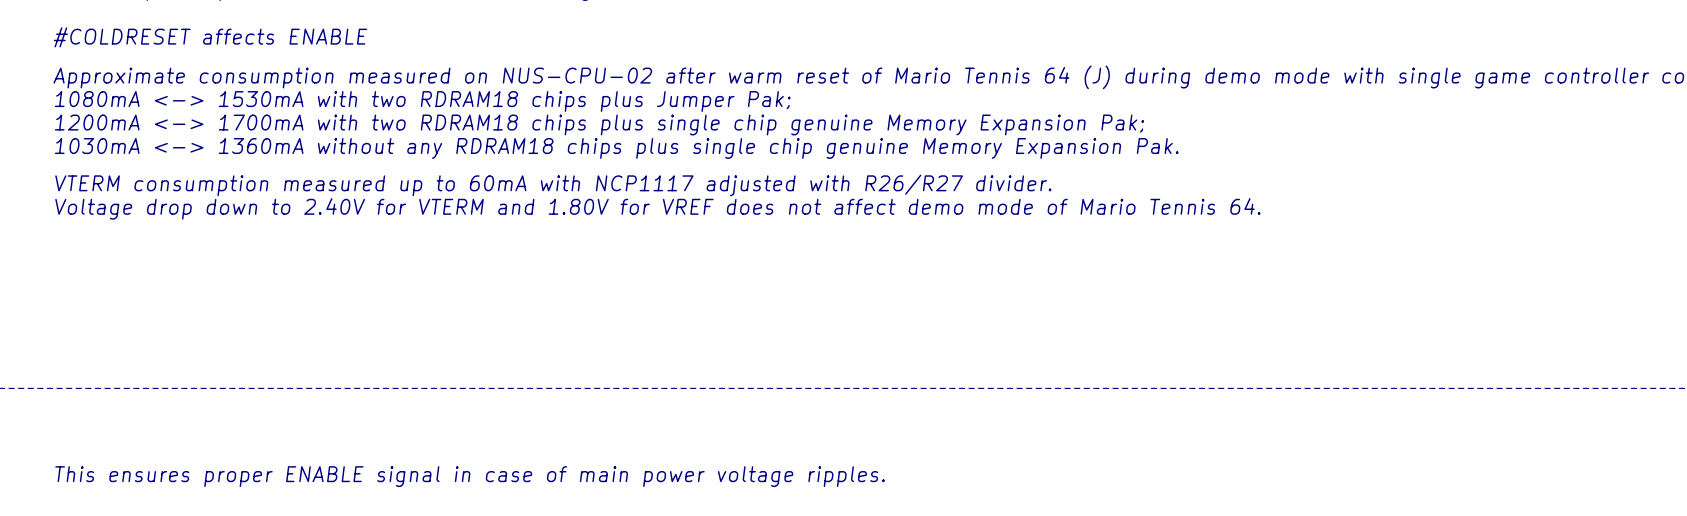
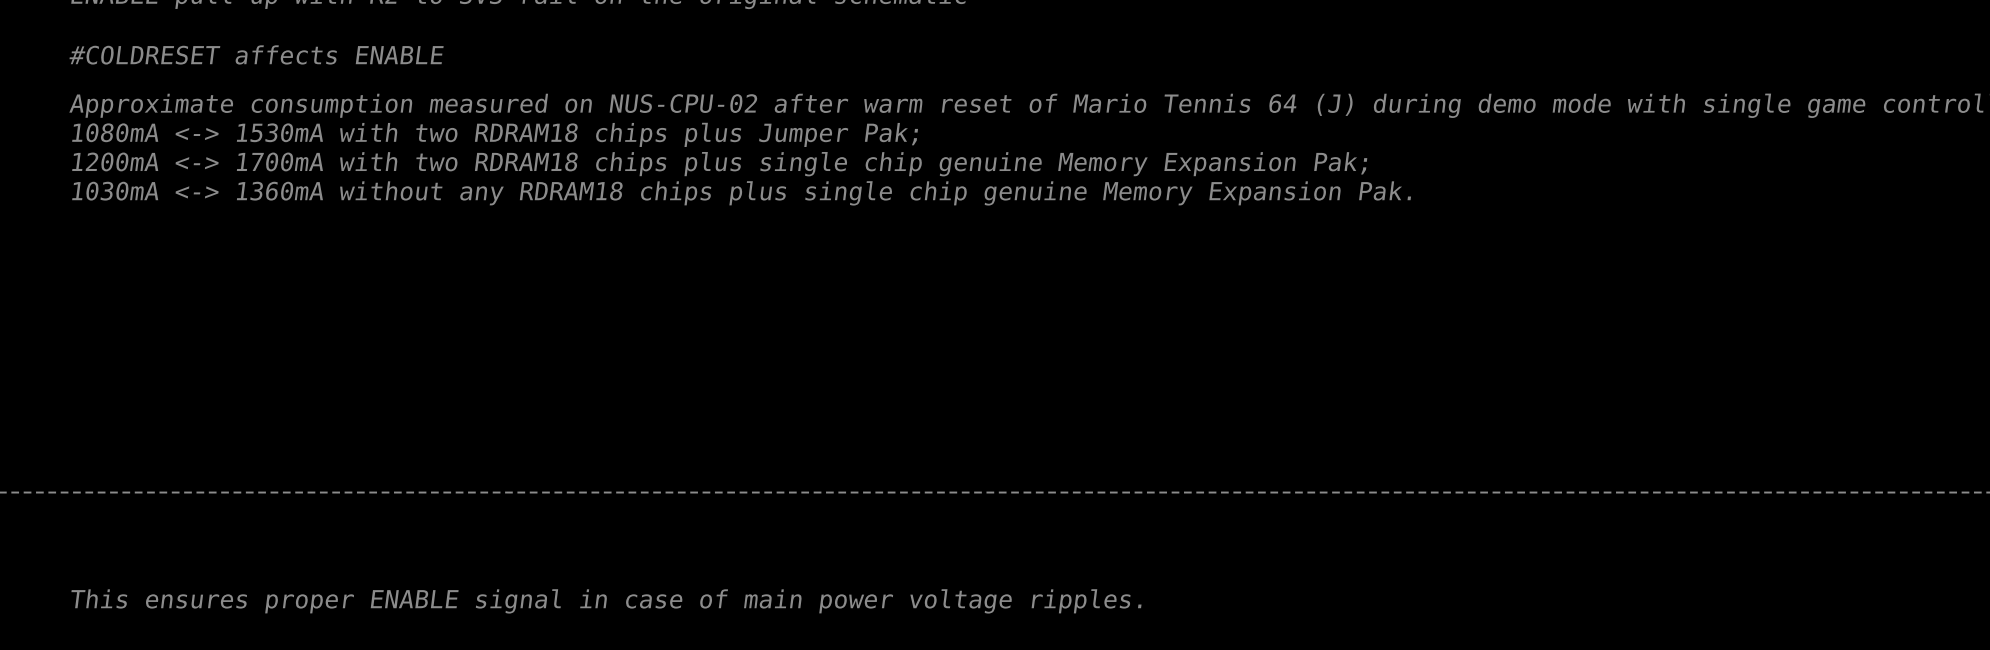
text: VTERM consumption measured up to 60mA with NCP1117 adjusted with R26/R27 divider. (553, 185) -> none
text: Voltage drop down to 2.40V for VTERM and 1.80V for VREF does not affect demo mode of Mario Tennis 64. (657, 208) -> none

